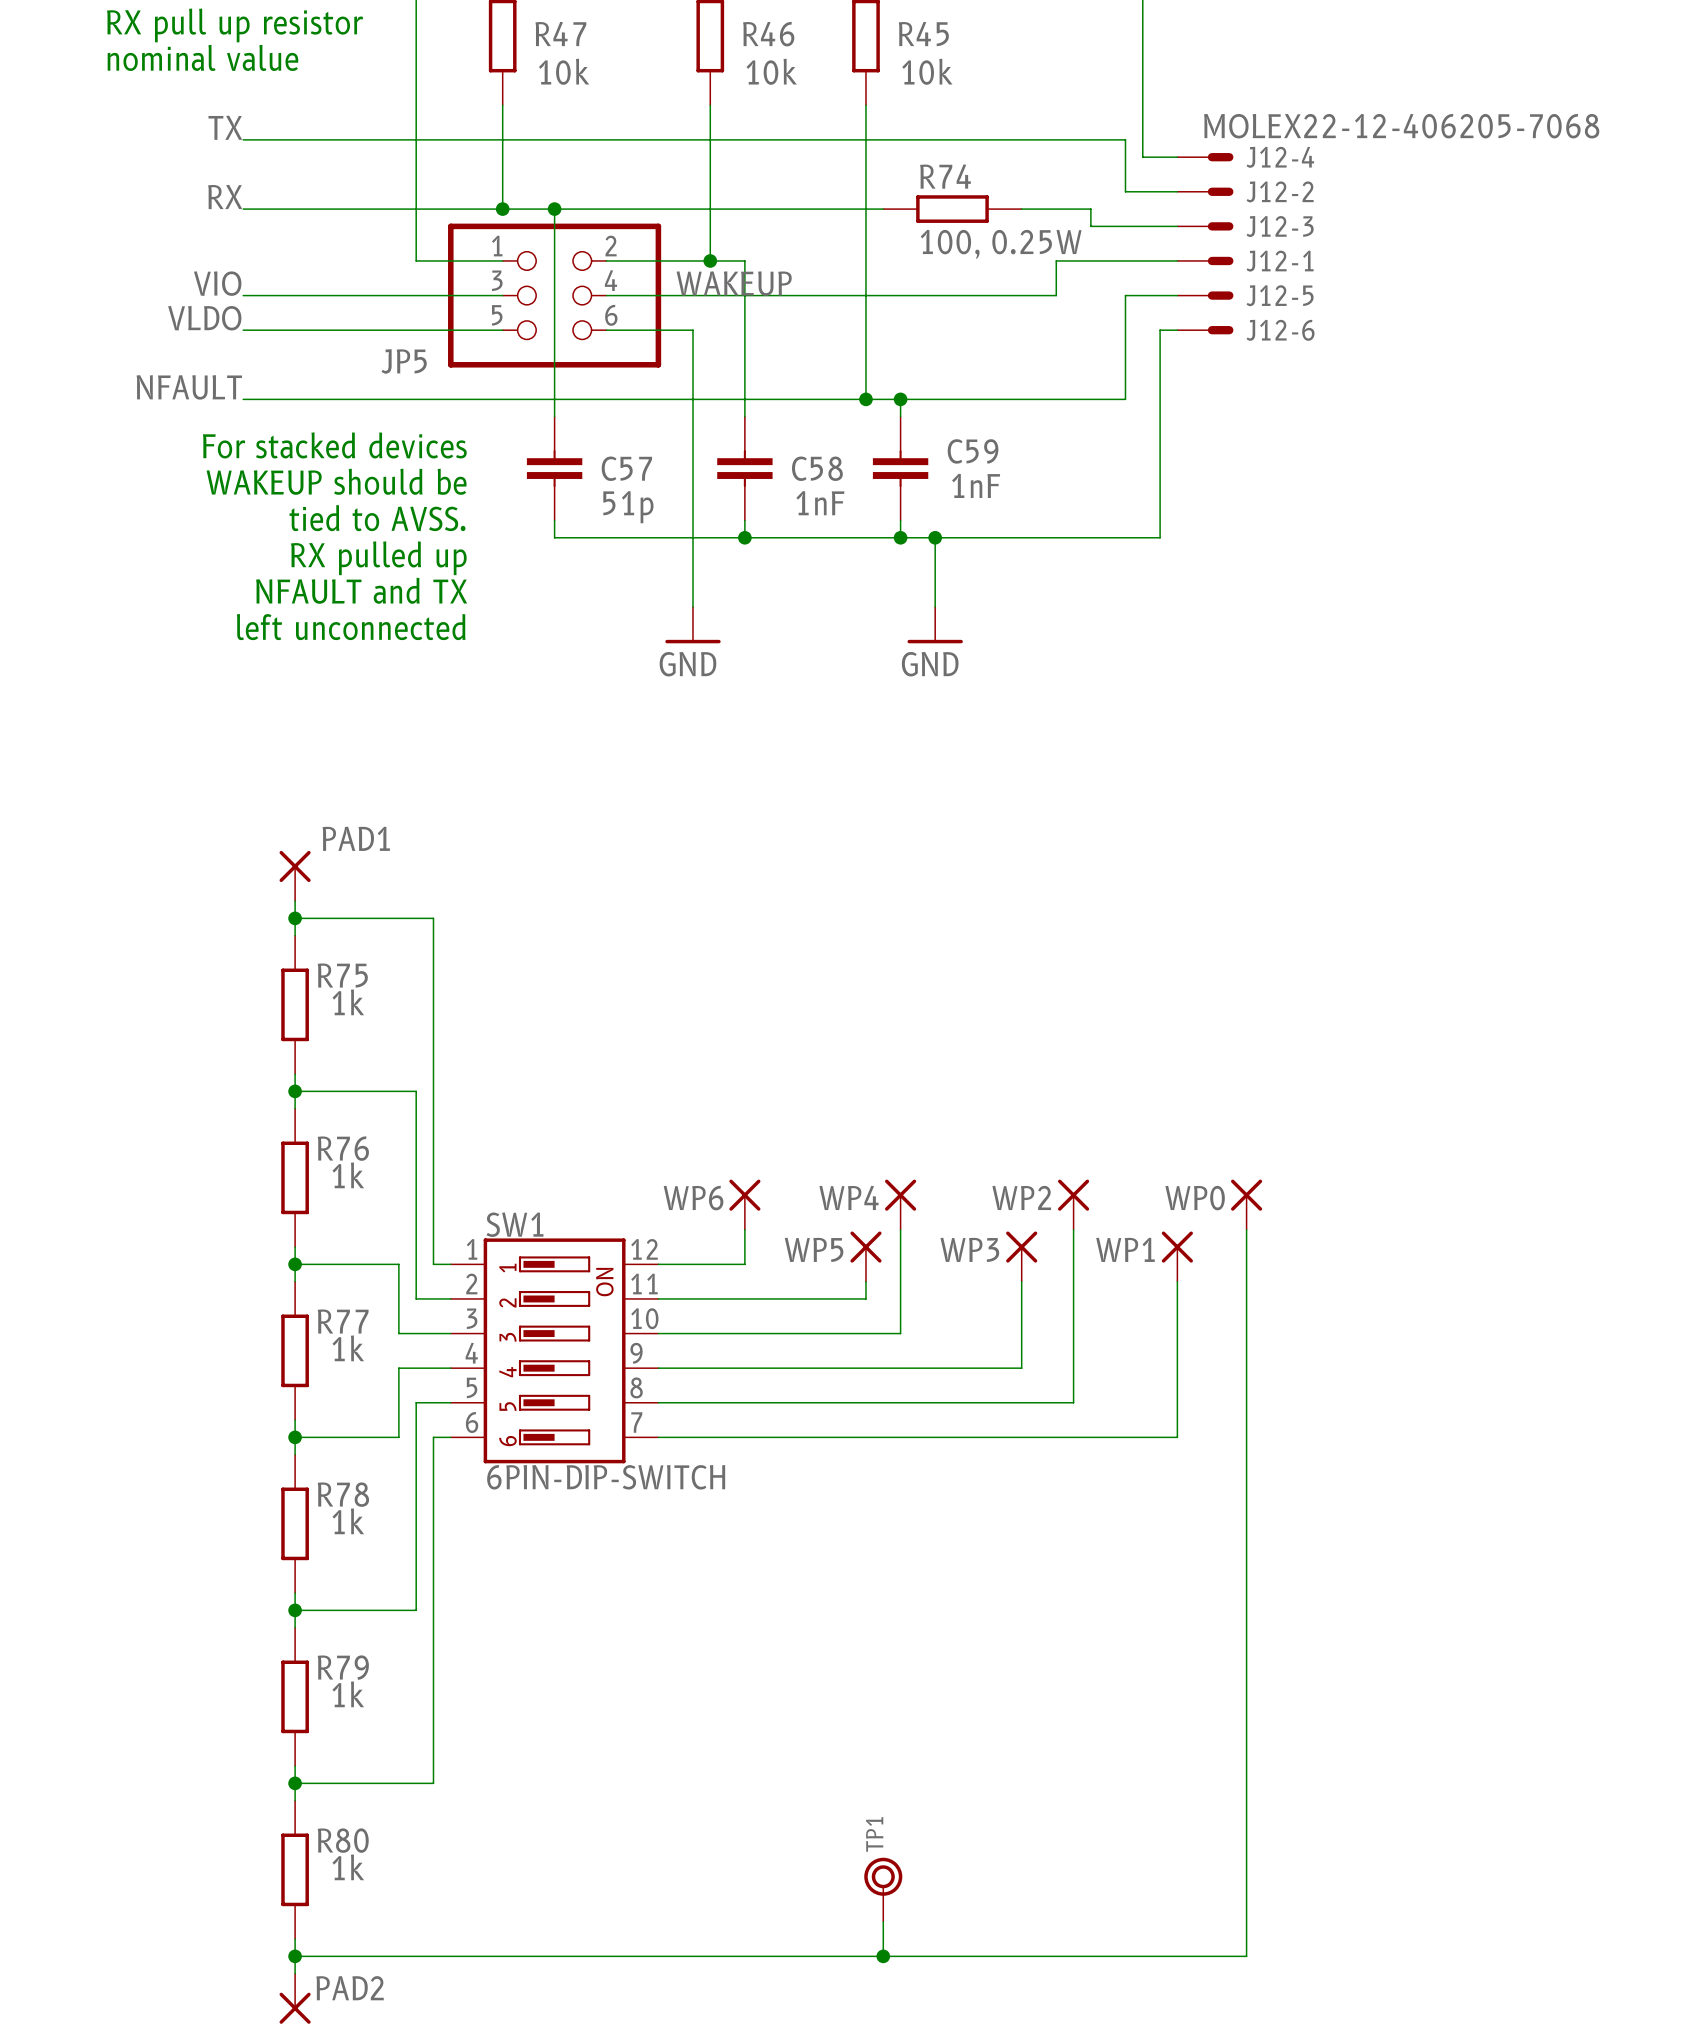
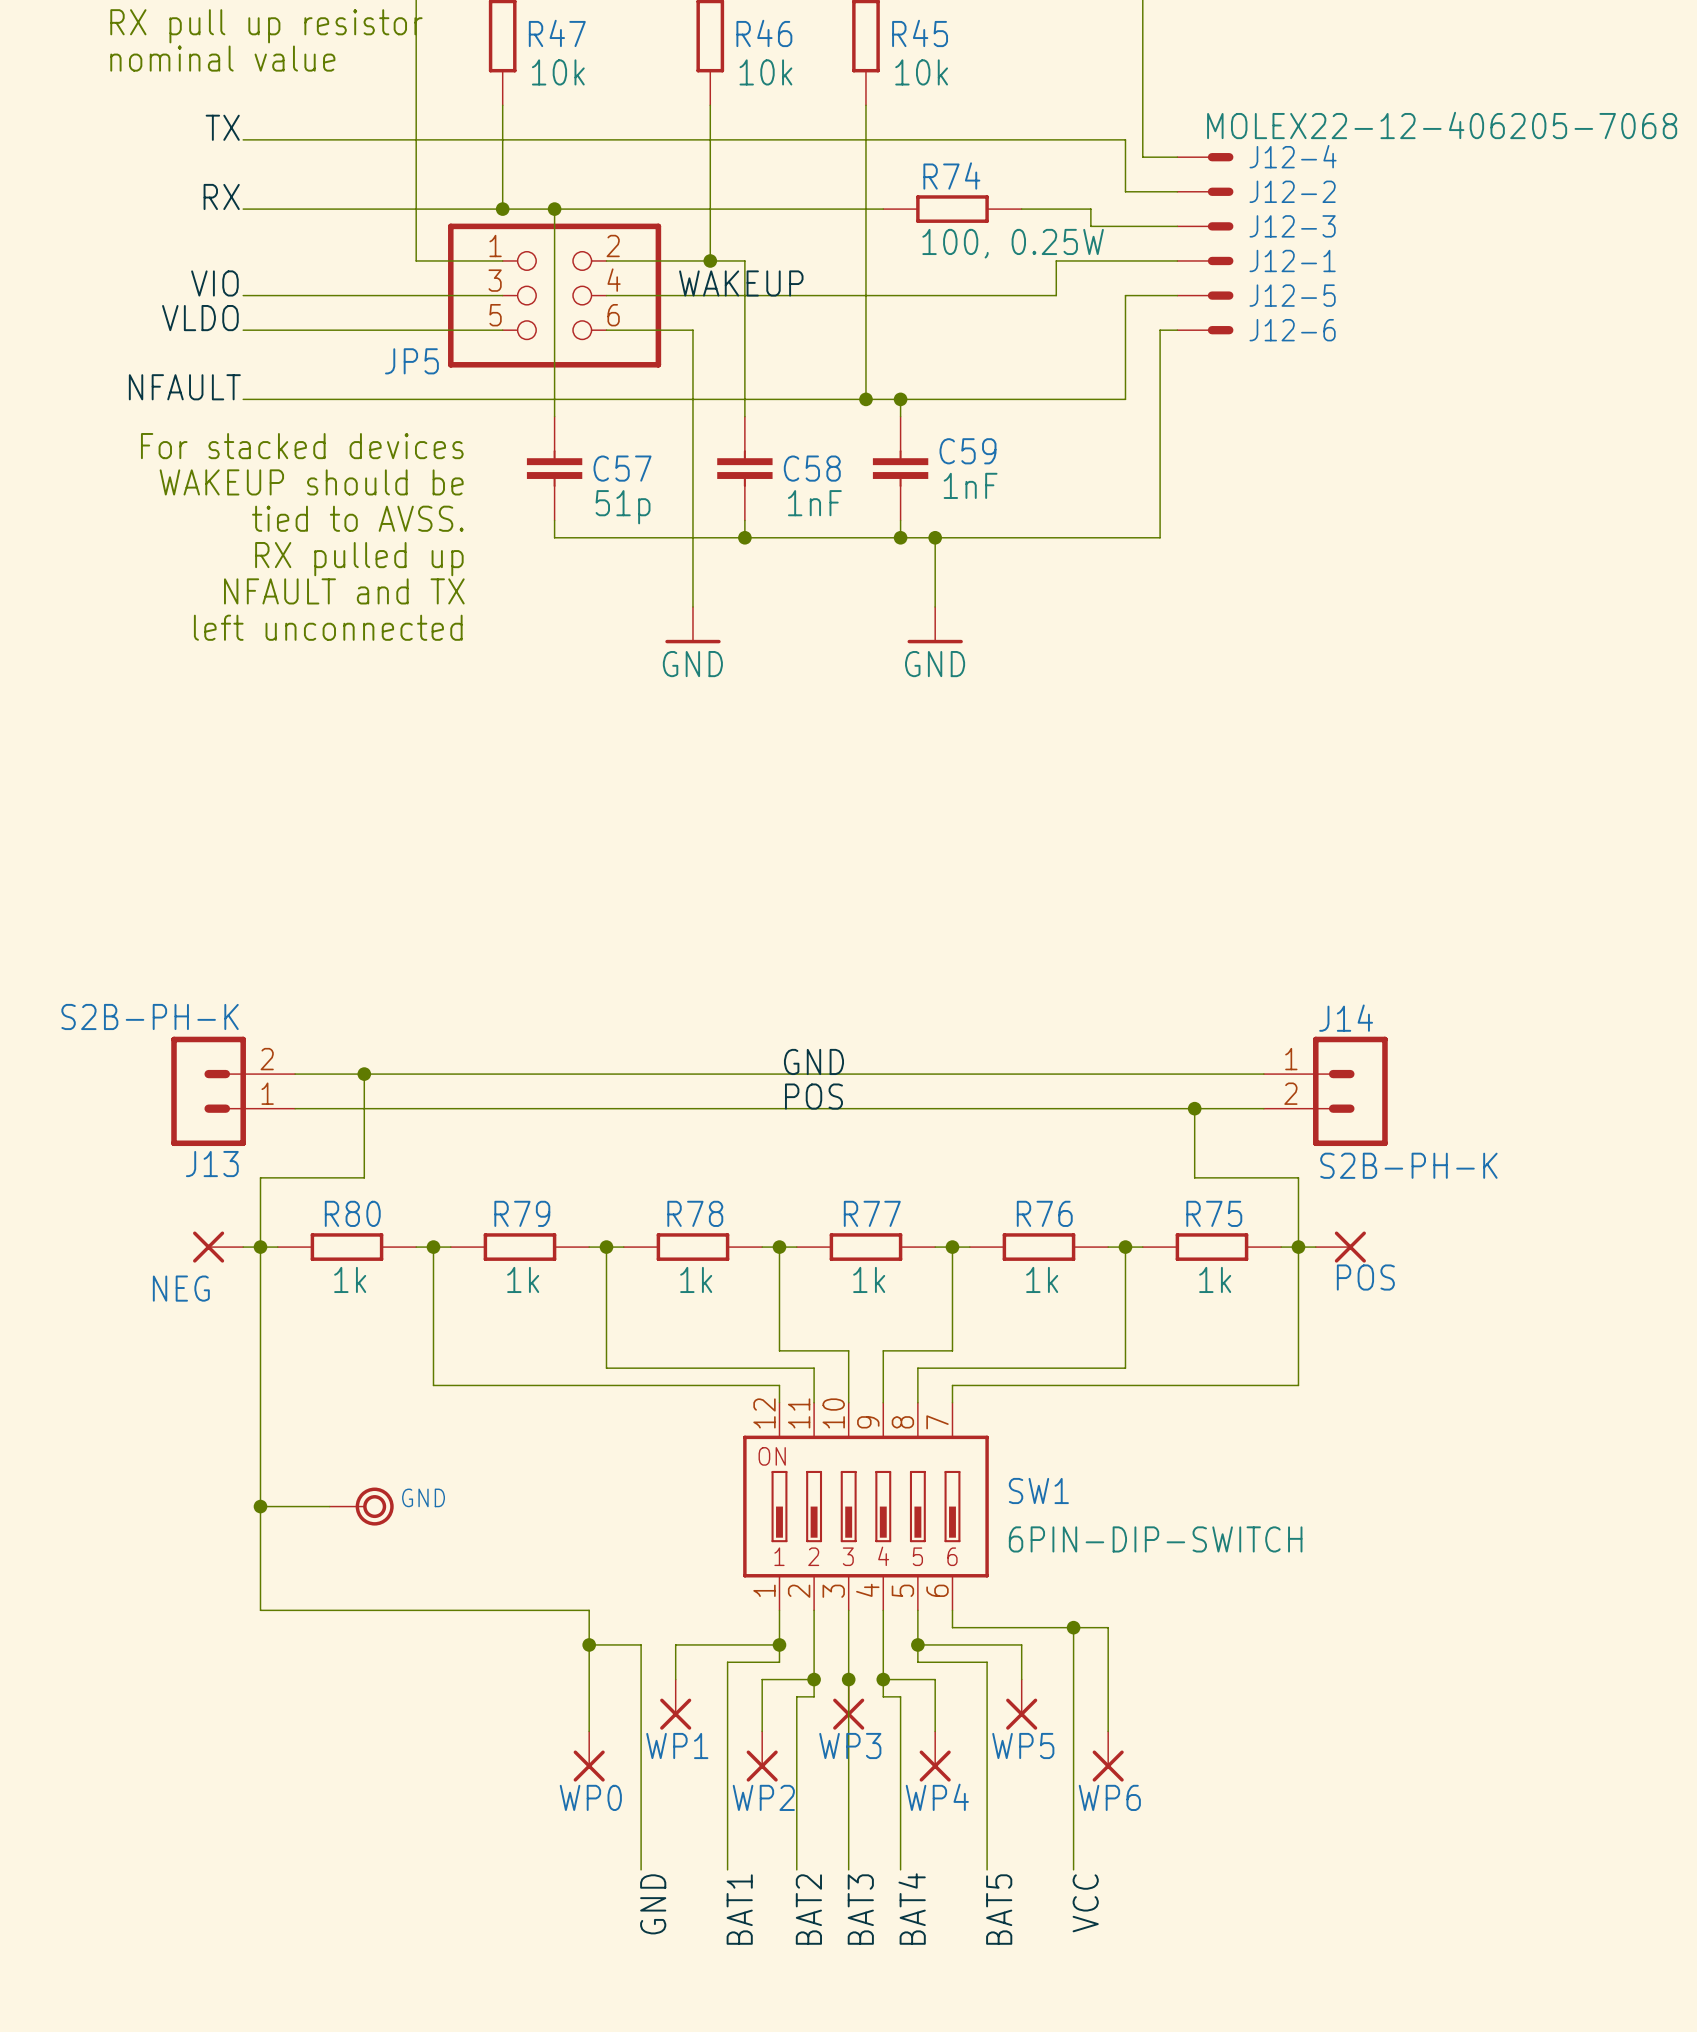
PAD1: (295, 875) -> none
wire: (295, 901) (295, 935) -> none
wire: (295, 918) (433, 918) (433, 1247) -> none
junction: (295, 918) -> none
R75 name position: R75 (342, 975) -> R75 (1214, 1213)
R75 rotation: 0° (295, 1004) -> 90° clockwise (1211, 1247)
R75 position: (295, 1004) -> (1211, 1247)
label: none -> GND (813, 1061)
wire: (295, 1074) (295, 1108) -> (295, 1074) (1263, 1074)
wire: none -> (364, 1074) (364, 1177) (260, 1177) (260, 1610) (295, 1610)
J13: none -> S2B-PH-K (233, 1091)
wire: (295, 1091) (416, 1091) (416, 1298) (450, 1298) -> none
junction position: (295, 1091) -> (364, 1074)
J14: none -> S2B-PH-K (1325, 1091)
label: none -> POS (813, 1096)
wire: none -> (295, 1108) (1263, 1108)
wire: none -> (1194, 1108) (1194, 1177) (1298, 1177) (1298, 1385) (952, 1385) (952, 1402)
junction: none -> (1194, 1108)
R76 name position: R76 (343, 1148) -> R76 (1044, 1213)
R76 rotation: 0° (295, 1177) -> 90° clockwise (1038, 1247)
R76 position: (295, 1177) -> (1038, 1247)
WP6 rotation: 0° (744, 1195) -> 180° (1108, 1766)
WP4 rotation: 0° (900, 1195) -> 180° (935, 1766)
WP2 rotation: 0° (1073, 1195) -> 180° (762, 1766)
WP0 rotation: 0° (1246, 1195) -> 180° (589, 1766)
WP4 name position: WP4 (849, 1197) -> WP4 (937, 1797)
WP2 name position: WP2 (1021, 1197) -> WP2 (763, 1797)
WP6 name position: WP6 (693, 1198) -> WP6 (1109, 1797)
WP0 name position: WP0 (1195, 1198) -> WP0 (590, 1797)
WP6 position: (744, 1204) -> (1108, 1756)
WP4 position: (900, 1204) -> (935, 1756)
WP2 position: (1073, 1204) -> (762, 1756)
WP0 position: (1246, 1204) -> (589, 1756)
SW1 name position: SW1 (515, 1224) -> SW1 (1038, 1490)
wire: (744, 1229) (744, 1264) (658, 1264) -> none
wire: (900, 1229) (900, 1333) (658, 1333) -> none
wire: (1073, 1229) (1073, 1402) (658, 1402) -> none
wire: (1246, 1229) (1246, 1956) (295, 1956) -> none
SW1 symbol: [450, 1238, 659, 1464] -> [743, 1402, 989, 1611]
NEG: none -> (218, 1247)
wire: none -> (243, 1247) (277, 1247)
wire: (295, 1247) (295, 1281) -> none
wire: none -> (416, 1247) (450, 1247)
junction: none -> (433, 1247)
wire: none -> (589, 1247) (623, 1247)
wire: none -> (606, 1247) (606, 1368) (658, 1368)
junction: none -> (606, 1247)
wire: none -> (762, 1247) (796, 1247)
wire: none -> (779, 1247) (779, 1350) (848, 1350) (848, 1402)
junction: none -> (779, 1247)
WP5 rotation: 0° (865, 1247) -> 180° (1021, 1714)
wire: none -> (935, 1247) (969, 1247)
wire: none -> (952, 1247) (952, 1350) (883, 1350) (883, 1402)
junction: none -> (952, 1247)
WP3 rotation: 0° (1021, 1247) -> 180° (848, 1714)
wire: none -> (1108, 1247) (1142, 1247)
junction: none -> (1125, 1247)
WP1 rotation: 0° (1177, 1247) -> 180° (675, 1714)
wire: none -> (1281, 1247) (1315, 1247)
junction: none -> (1298, 1247)
POS: none -> (1340, 1247)
WP5 name position: WP5 (814, 1249) -> WP5 (1023, 1745)
WP3 name position: WP3 (969, 1249) -> WP3 (850, 1745)
WP1 name position: WP1 (1125, 1249) -> WP1 (677, 1745)
WP5 position: (865, 1256) -> (1021, 1704)
WP3 position: (1021, 1256) -> (848, 1704)
WP1 position: (1177, 1256) -> (675, 1704)
wire: (295, 1264) (398, 1264) (398, 1333) (450, 1333) -> none
junction position: (295, 1264) -> (260, 1247)
wire: (433, 1264) (450, 1264) -> (433, 1264) (433, 1385) (779, 1385) (779, 1402)
wire: (865, 1281) (865, 1298) (658, 1298) -> none
wire: (1021, 1281) (1021, 1368) -> (1125, 1247) (1125, 1368) (1021, 1368)
wire: (1177, 1281) (1177, 1437) (658, 1437) -> none
R77 name position: R77 (343, 1321) -> R77 (872, 1213)
R77 rotation: 0° (295, 1350) -> 90° clockwise (865, 1247)
R77 position: (295, 1350) -> (865, 1247)
wire: (450, 1368) (398, 1368) (398, 1437) (295, 1437) -> none
wire: (814, 1368) (917, 1368) -> (814, 1368) (814, 1402)
wire: none -> (917, 1368) (917, 1402)
wire: (450, 1402) (416, 1402) (416, 1610) -> (589, 1731) (589, 1610) (416, 1610)
wire: (295, 1420) (295, 1454) -> none
junction: (295, 1437) -> none
wire: (450, 1437) (433, 1437) (433, 1783) (295, 1783) -> none
SW1 value position: 6PIN-DIP-SWITCH (606, 1477) -> 6PIN-DIP-SWITCH (1155, 1539)
R78 name position: R78 (343, 1494) -> R78 (695, 1213)
wire: none -> (260, 1506) (329, 1506)
junction: none -> (260, 1506)
GND: none -> (361, 1506)
R78 rotation: 0° (295, 1523) -> 90° clockwise (692, 1247)
R78 position: (295, 1523) -> (692, 1247)
wire: (295, 1593) (295, 1627) -> none
junction: (295, 1610) -> none
wire: none -> (779, 1610) (779, 1662) (727, 1662) (727, 1869)
wire: none -> (814, 1610) (814, 1696) (796, 1696) (796, 1869)
wire: none -> (848, 1610) (848, 1869)
wire: none -> (883, 1610) (883, 1696) (900, 1696) (900, 1869)
wire: none -> (917, 1610) (917, 1662) (987, 1662) (987, 1869)
wire: none -> (952, 1610) (952, 1627) (1108, 1627) (1108, 1731)
wire: none -> (1073, 1627) (1073, 1869)
junction: none -> (1073, 1627)
wire: none -> (589, 1644) (641, 1644) (641, 1869)
junction: none -> (589, 1644)
wire: none -> (779, 1644) (675, 1644) (675, 1679)
junction: none -> (779, 1644)
wire: none -> (917, 1644) (1021, 1644) (1021, 1679)
junction: none -> (917, 1644)
R79 name position: R79 (343, 1667) -> R79 (522, 1213)
wire: none -> (814, 1679) (762, 1679) (762, 1731)
junction: none -> (814, 1679)
junction: none -> (848, 1679)
wire: none -> (883, 1679) (935, 1679) (935, 1731)
junction: none -> (883, 1679)
R79 rotation: 0° (295, 1696) -> 90° clockwise (519, 1247)
R79 position: (295, 1696) -> (519, 1247)
wire: (295, 1766) (295, 1800) -> none
junction: (295, 1783) -> none
R80 name position: R80 (343, 1840) -> R80 (352, 1213)
R80 rotation: 0° (295, 1869) -> 90° clockwise (346, 1247)
R80 position: (295, 1869) -> (346, 1247)
TP1: (883, 1889) -> none
label: none -> VCC (1085, 1903)
label: none -> GND (653, 1904)
label: none -> BAT4 (912, 1909)
label: none -> BAT1 (739, 1909)
label: none -> BAT2 (808, 1909)
label: none -> BAT3 (860, 1909)
label: none -> BAT5 (999, 1909)
wire: (883, 1921) (883, 1956) -> none
wire: (295, 1939) (295, 1973) -> none
junction: (295, 1956) -> none
junction: (883, 1956) -> none
PAD2: (295, 1998) -> none

